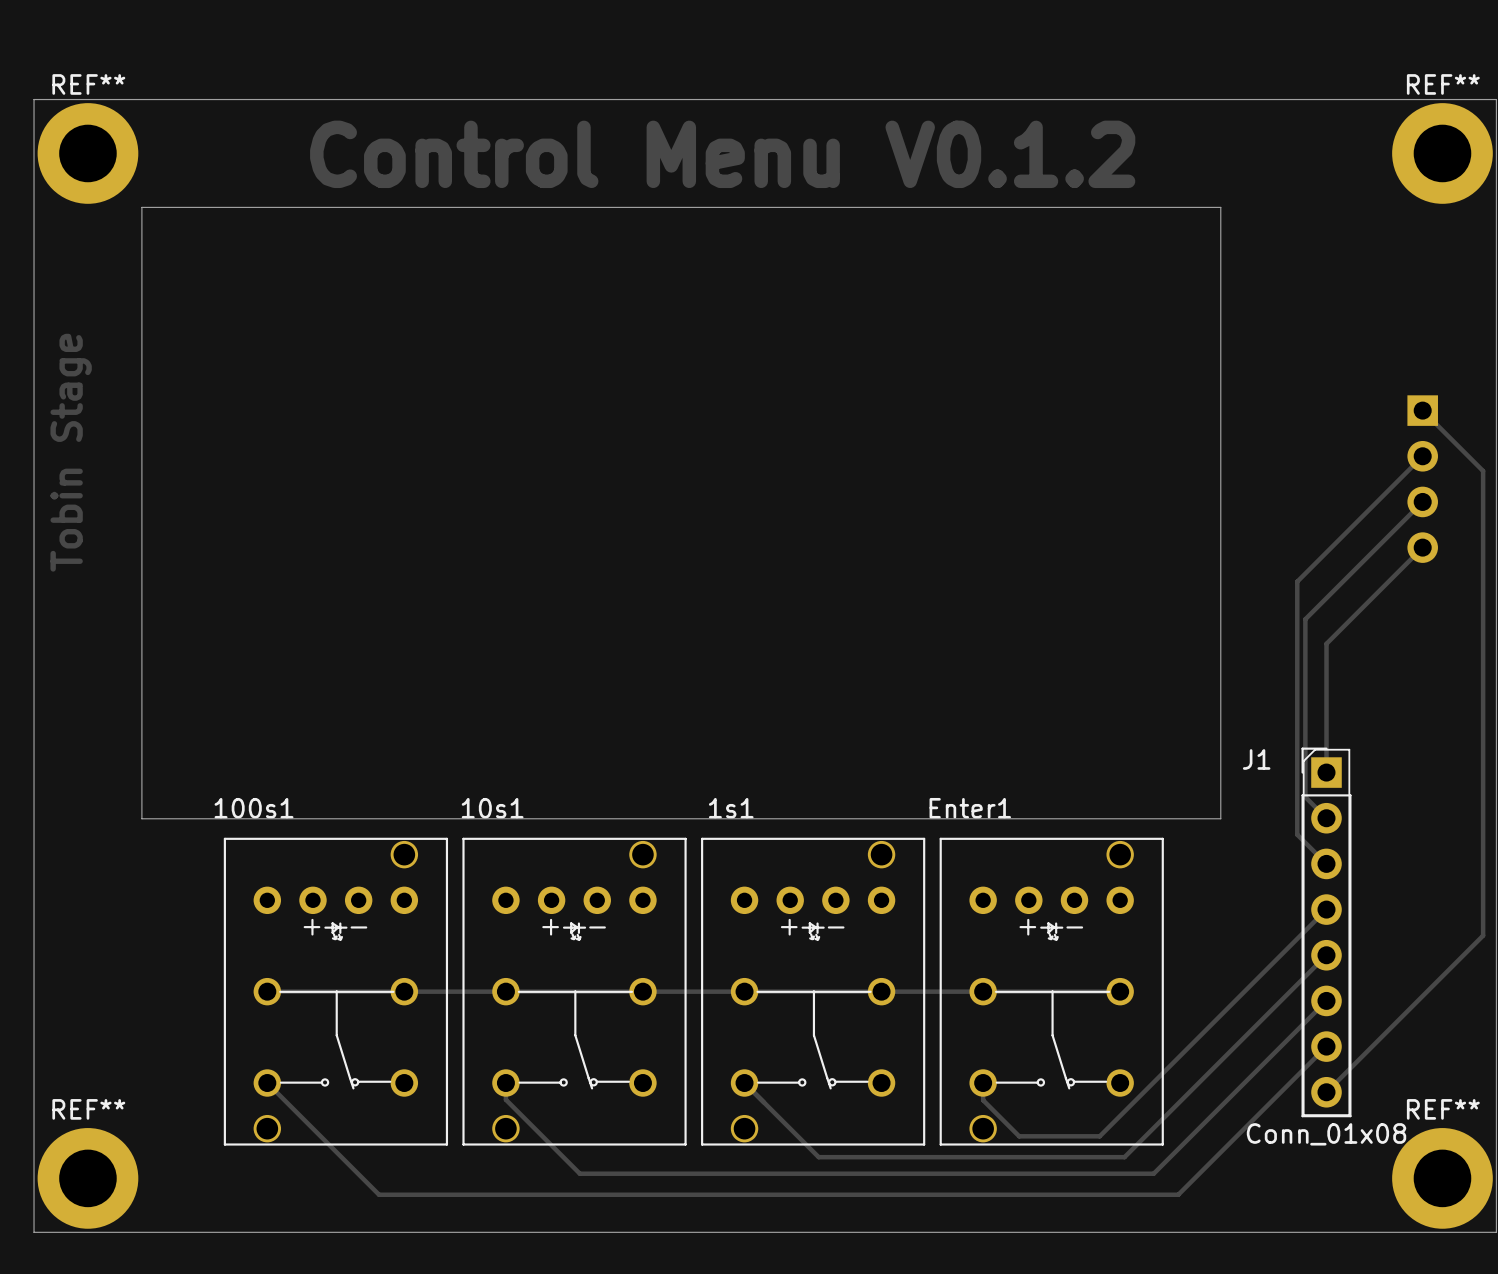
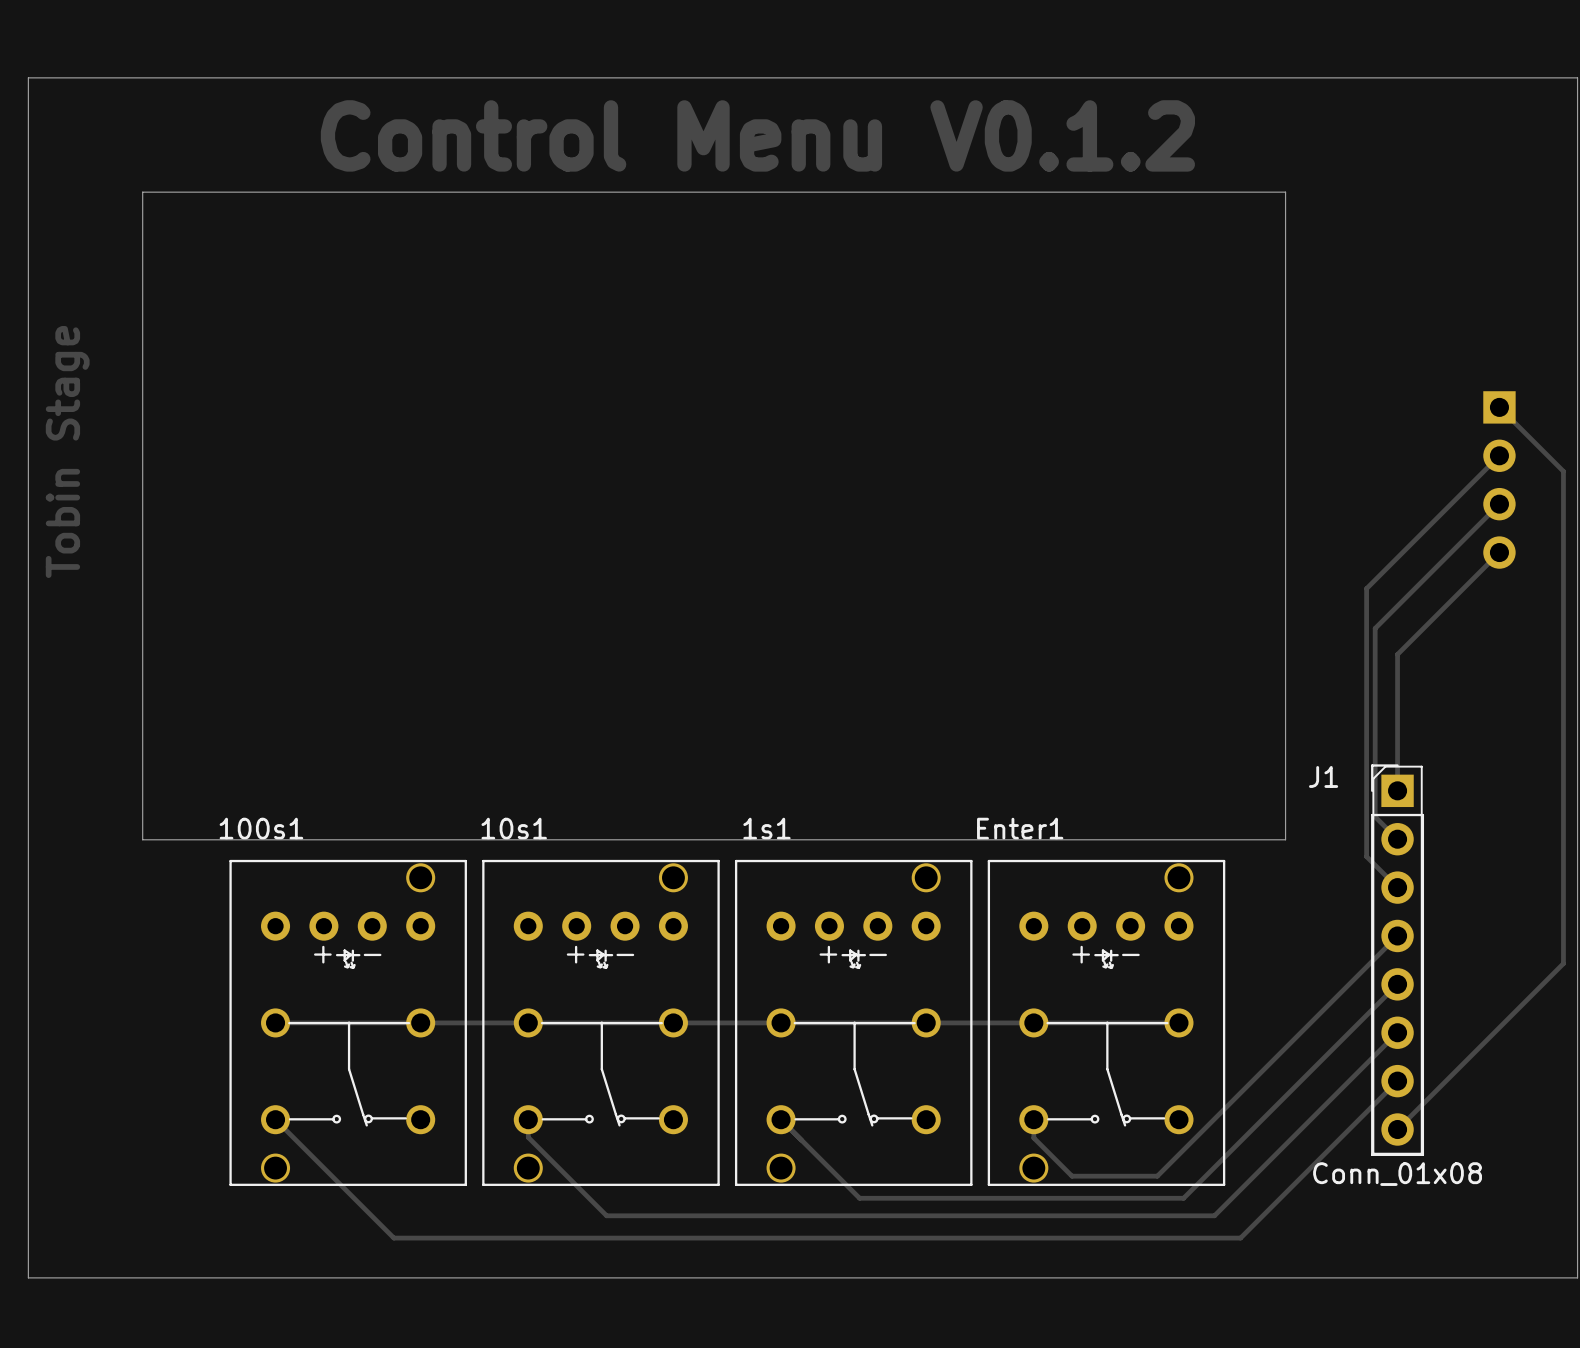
REF**: (87, 153) -> none
REF**: (1442, 153) -> none
REF**: (87, 1178) -> none
REF**: (1442, 1178) -> none

